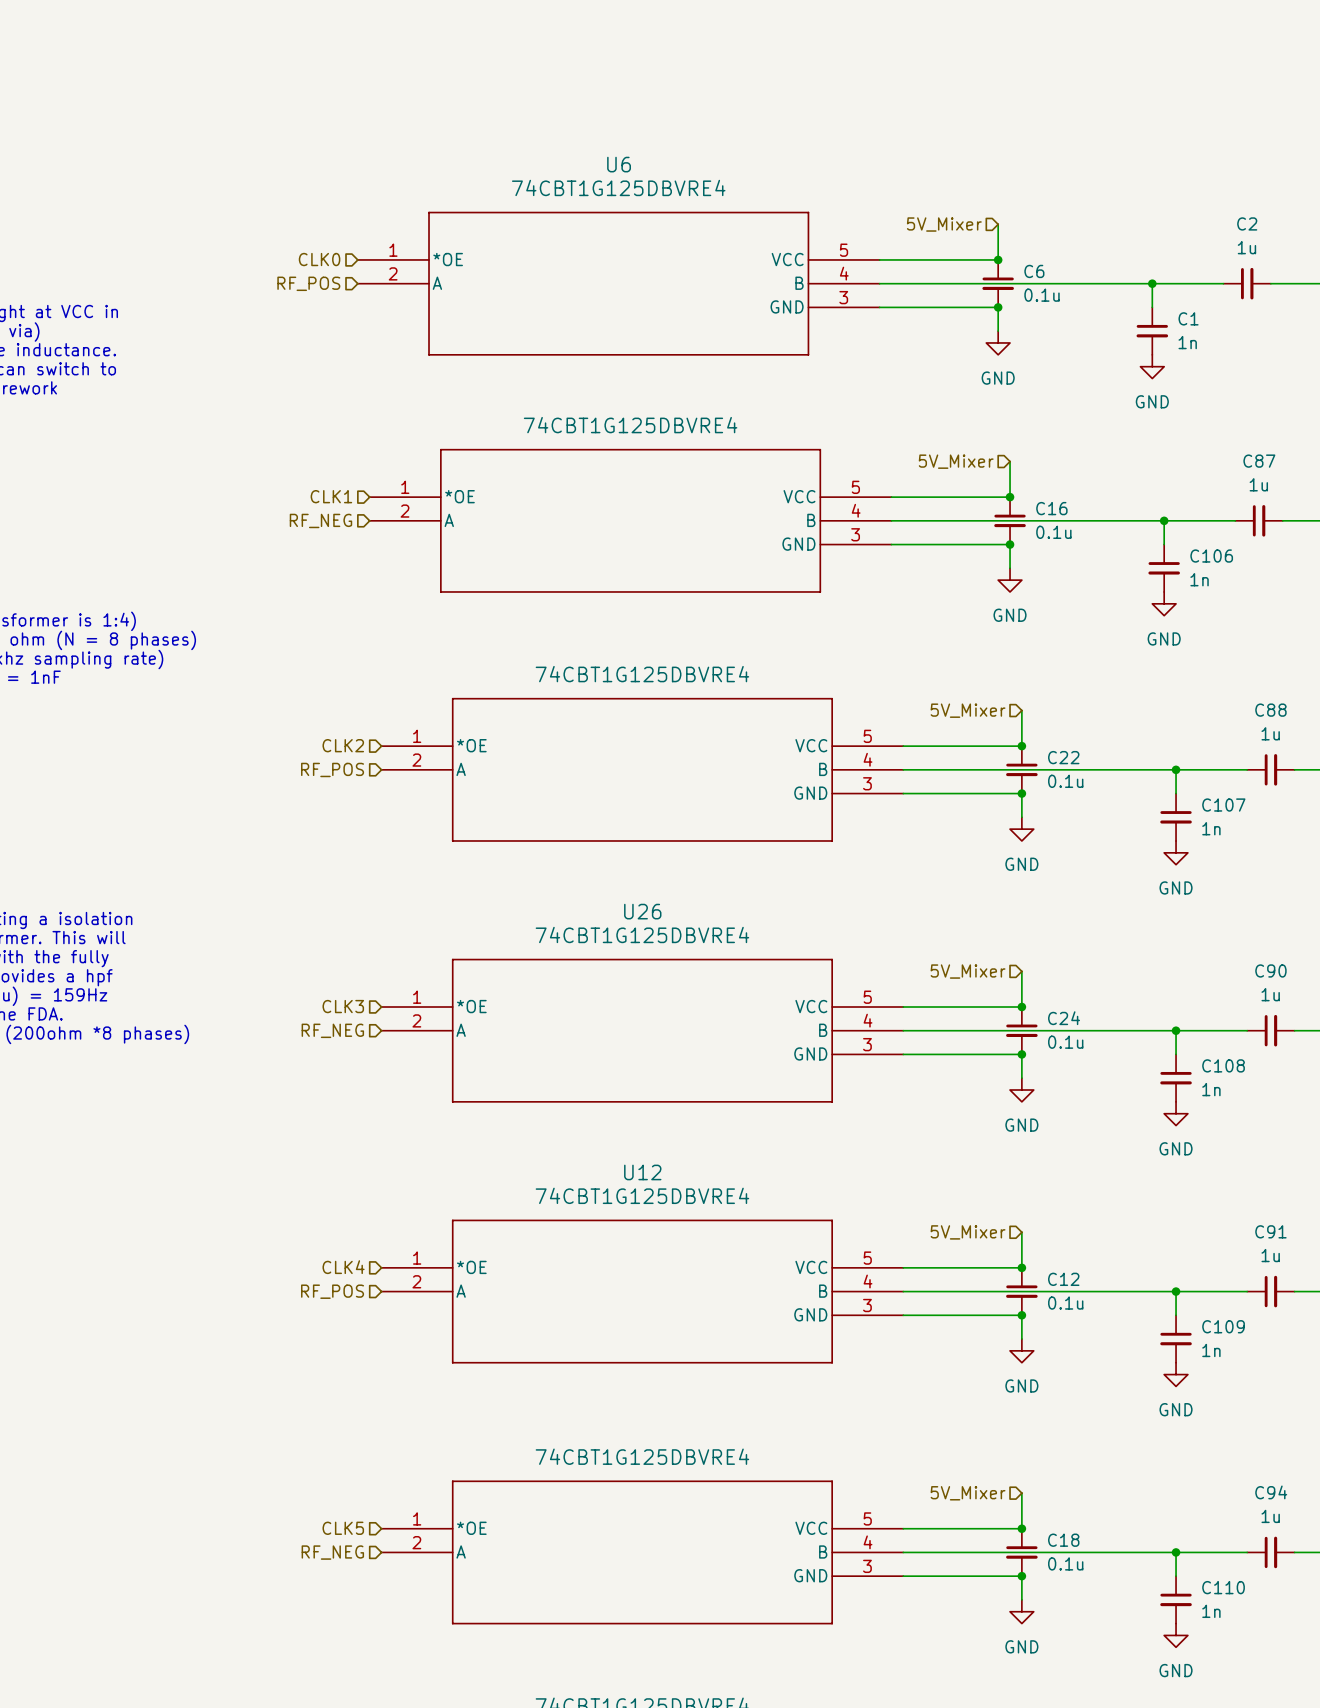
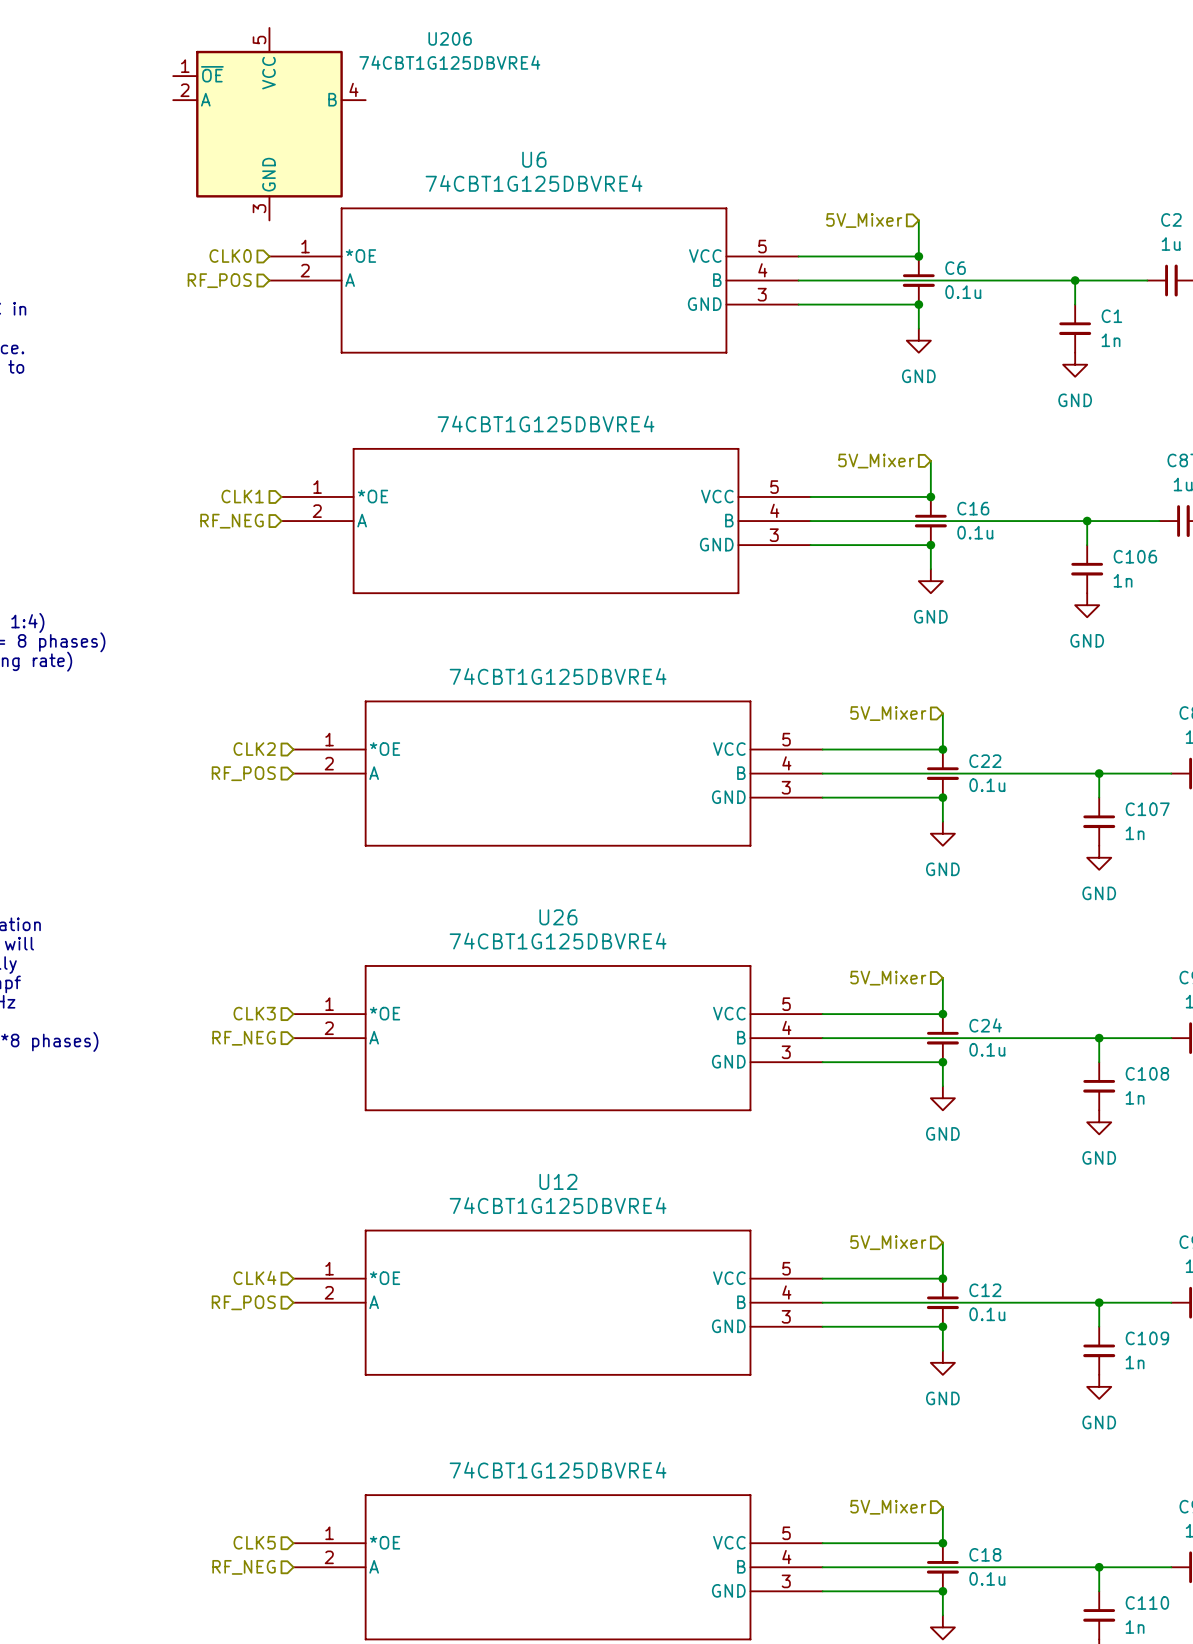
U206: none -> 74CBT1G125DBVRE4 (269, 124)

